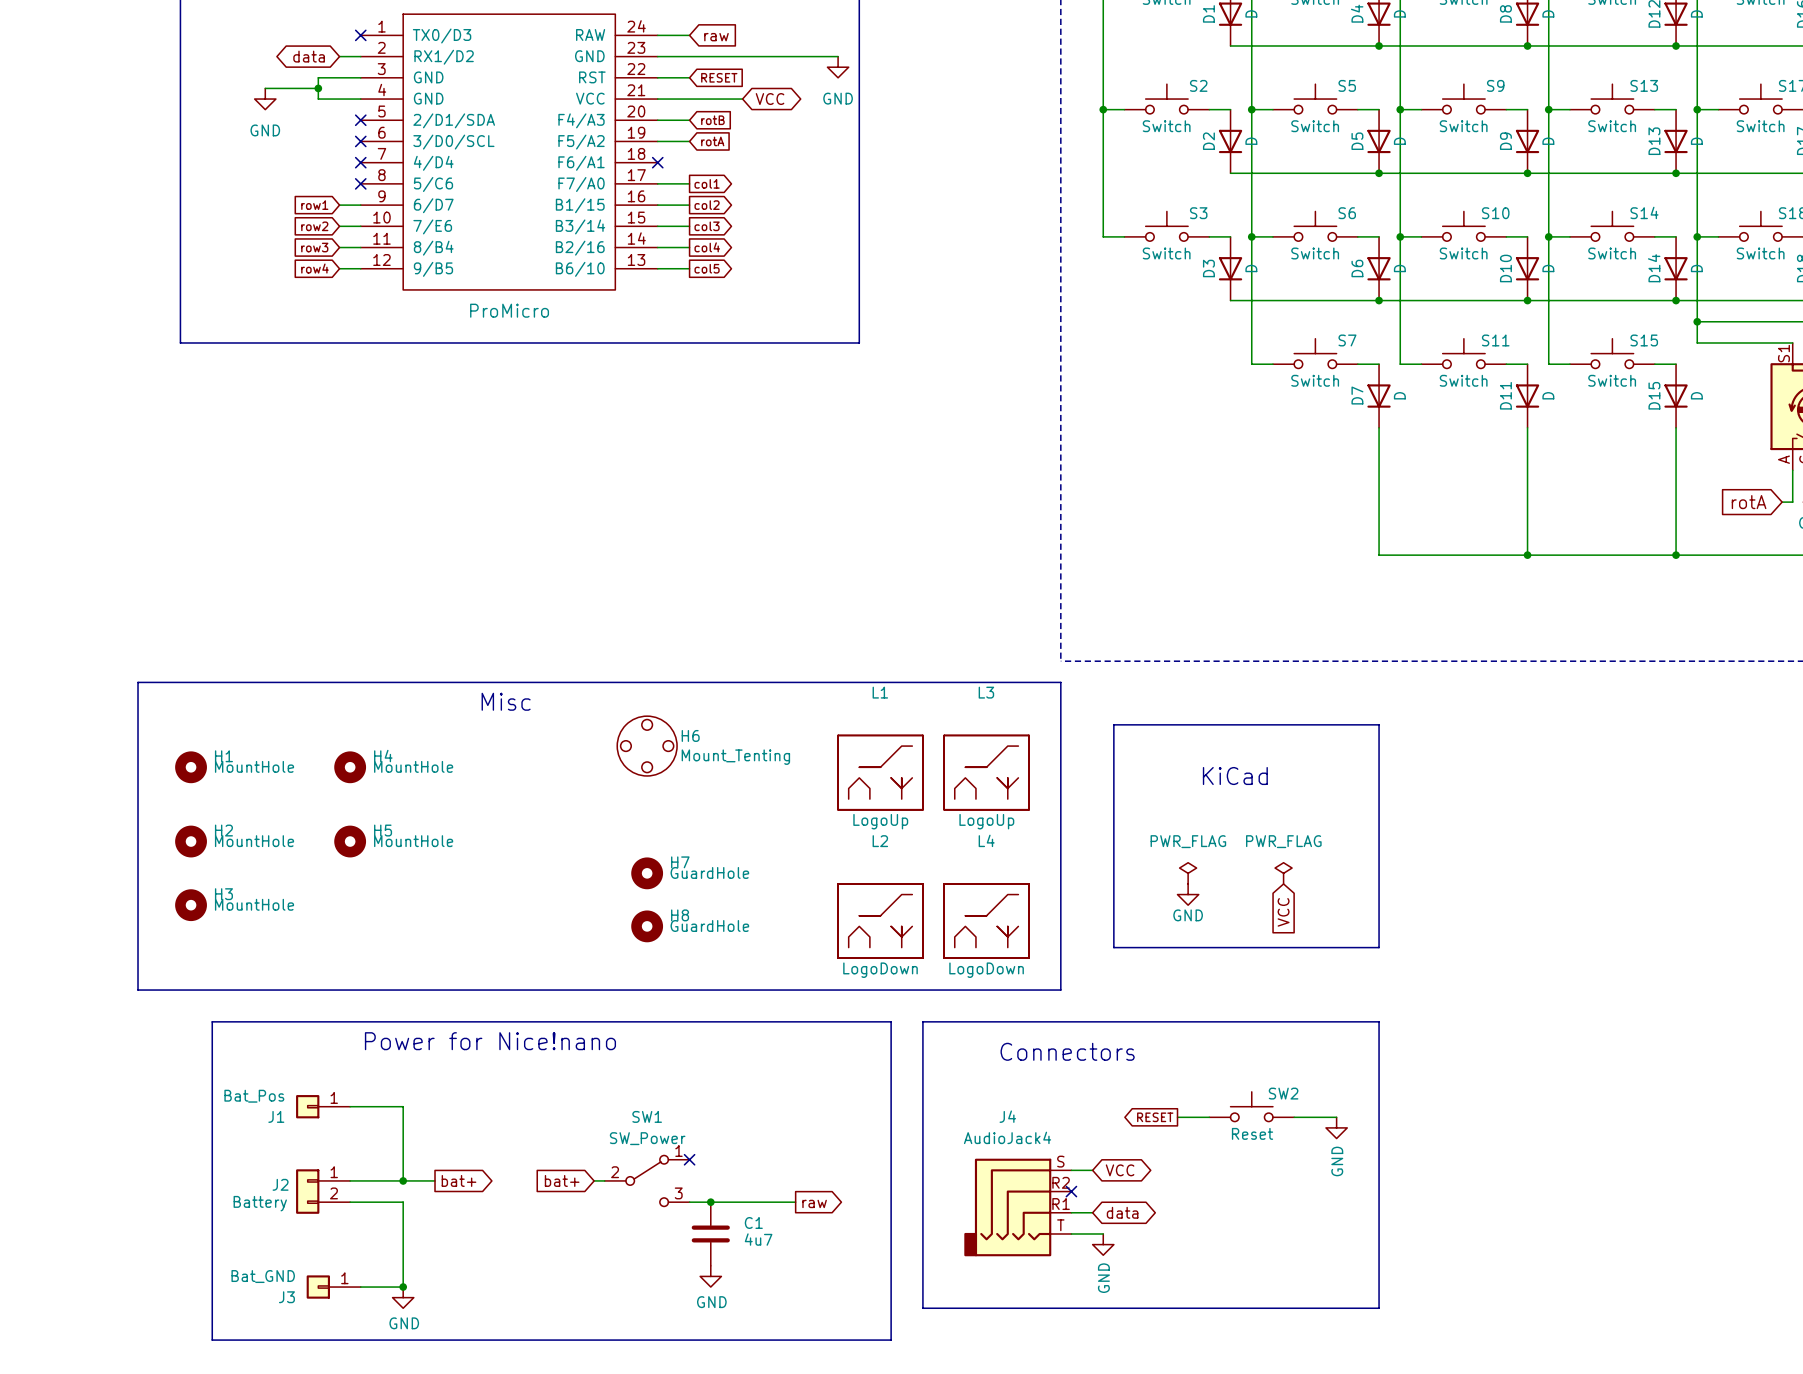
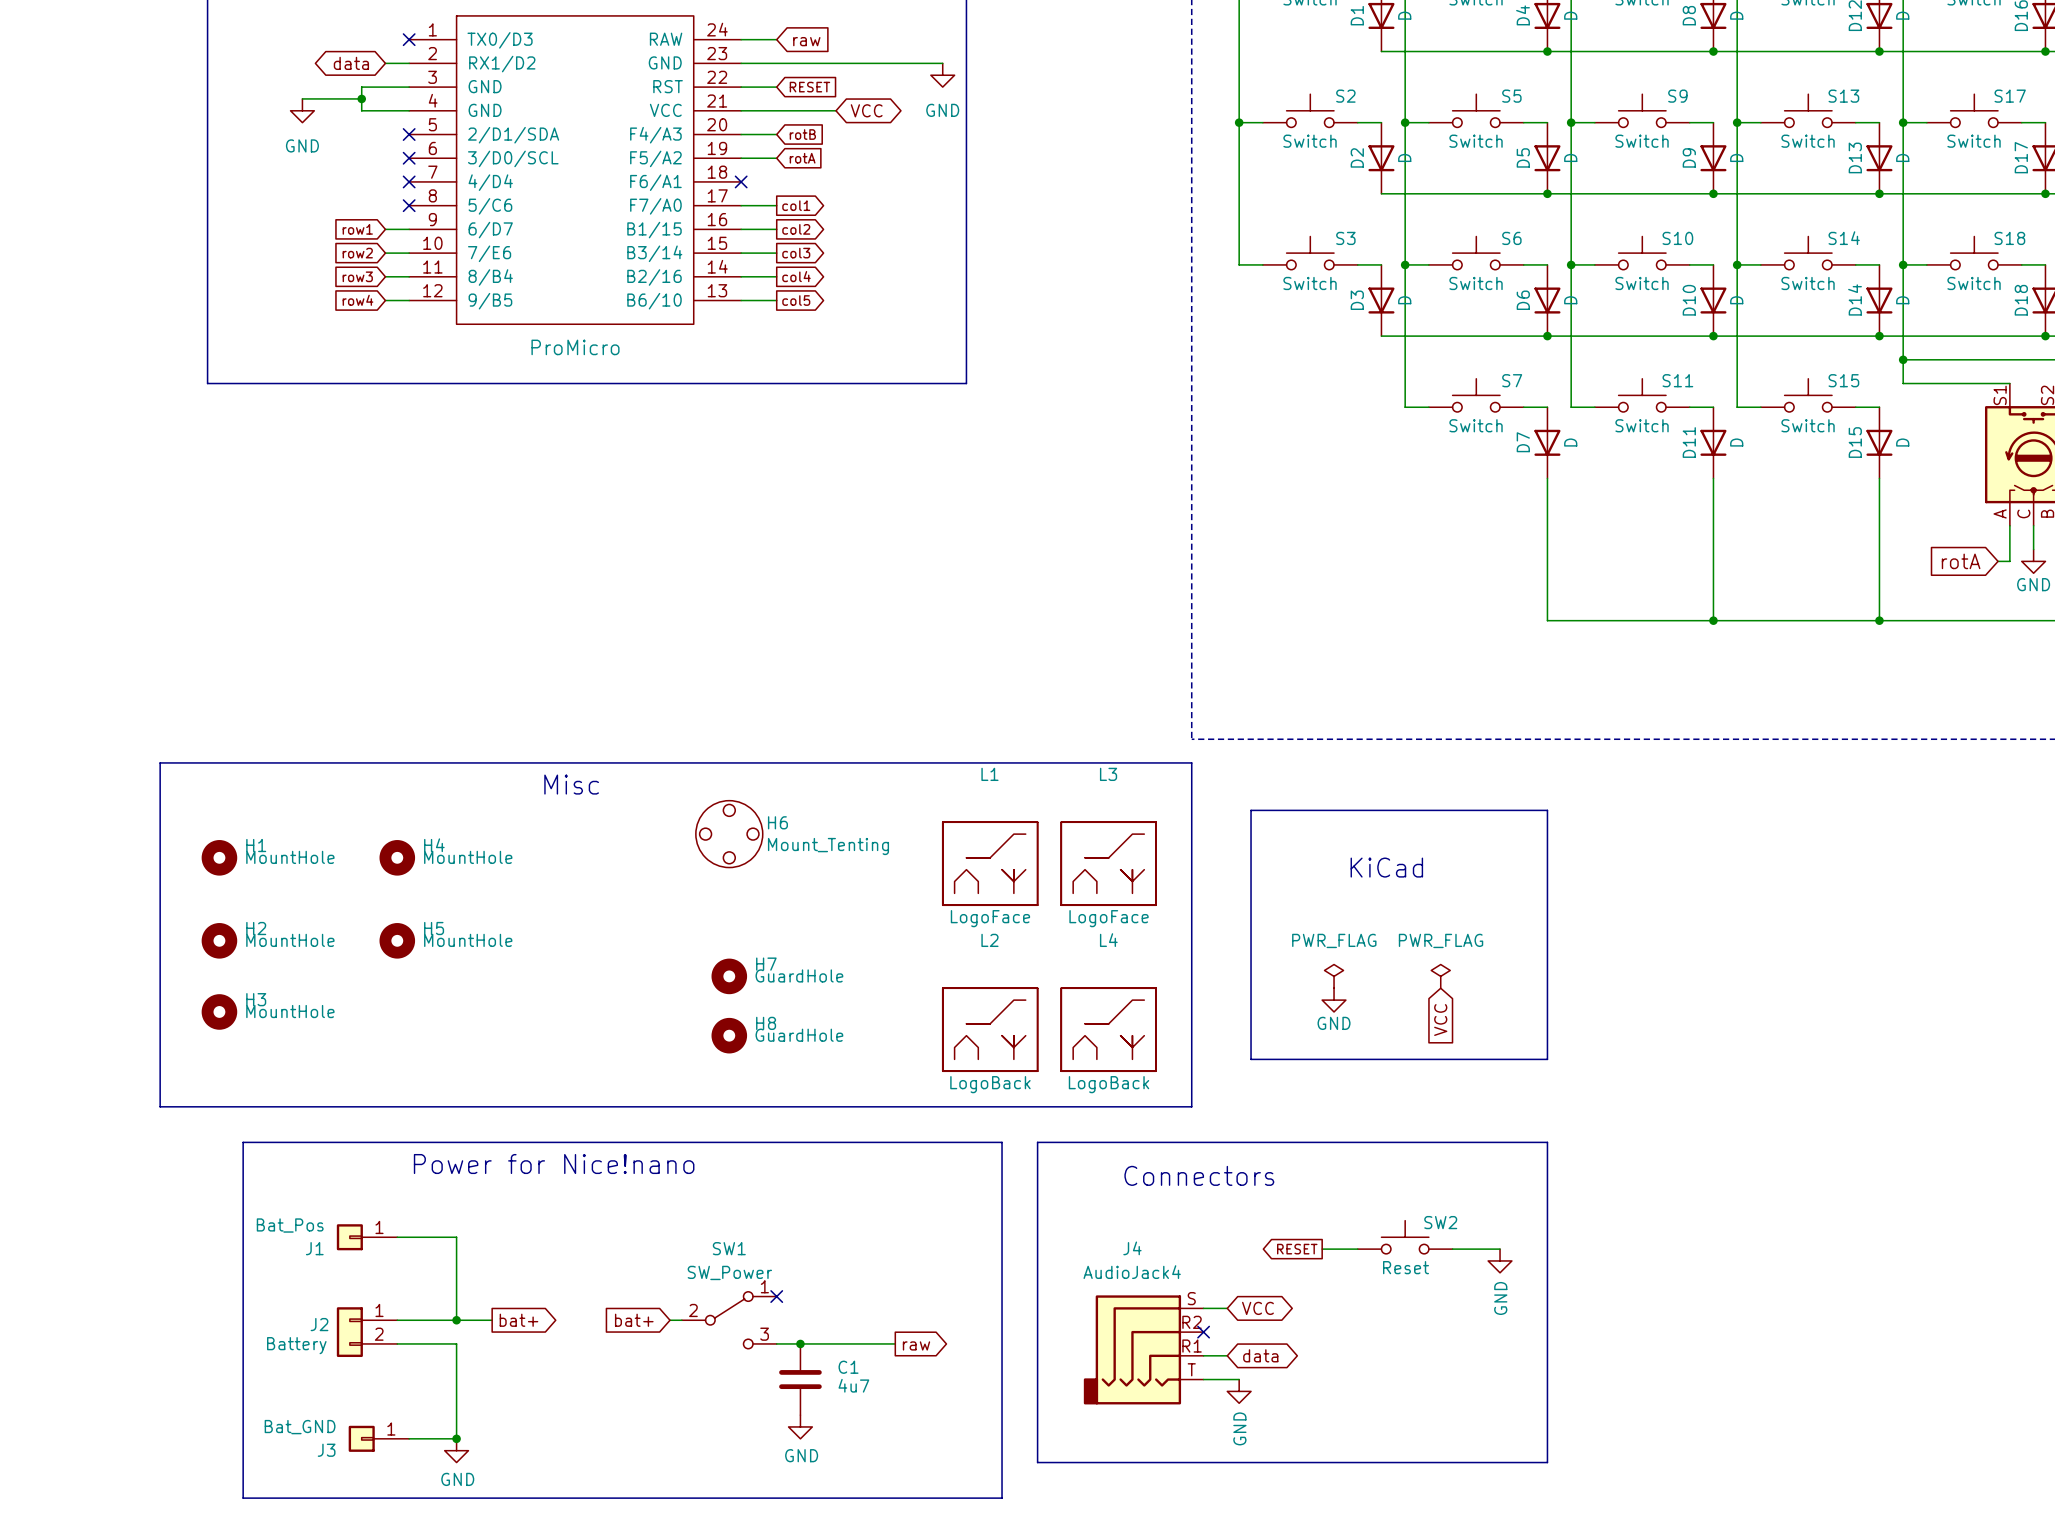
L1 value: LogoUp (880, 821) -> LogoFace (990, 918)
L3 value: LogoUp (986, 821) -> LogoFace (1109, 918)
L2 value: LogoDown (880, 970) -> LogoBack (990, 1084)
L4 value: LogoDown (986, 970) -> LogoBack (1109, 1084)

